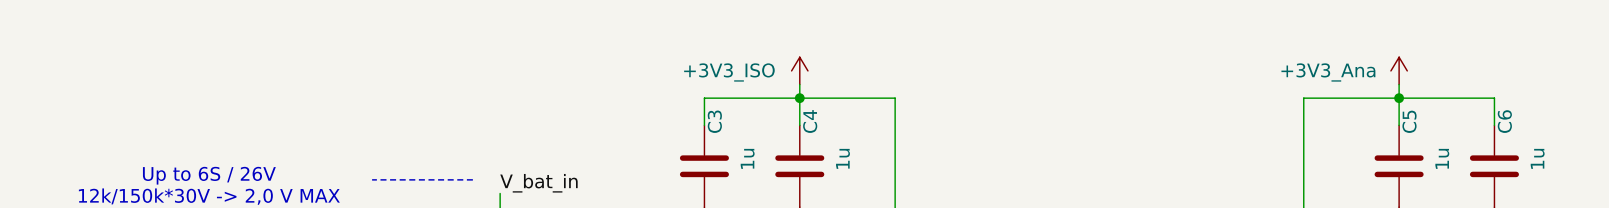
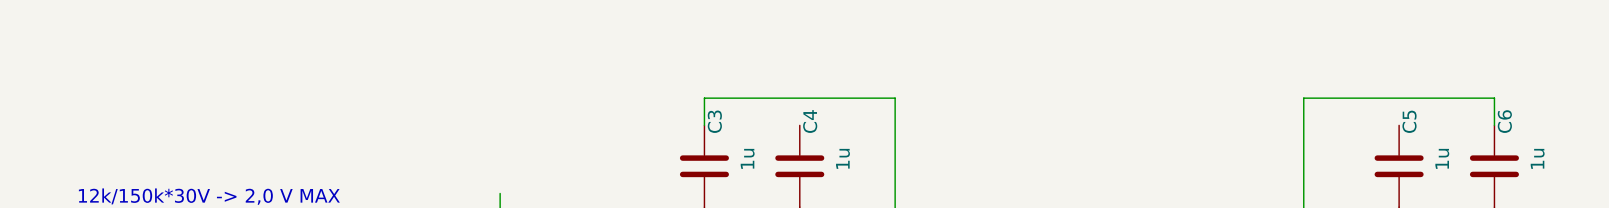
power symbol: +3V3_ISO (799, 70) -> none
power symbol: +3V3_Ana (1399, 70) -> none
wire: (799, 84) (799, 125) -> none
wire: (1399, 84) (1399, 125) -> none
junction: (799, 98) -> none
junction: (1399, 98) -> none
text: Up to 6S / 26V (209, 175) -> none
line: (372, 179) (472, 179) -> none
label: V_bat_in (538, 183) -> none

